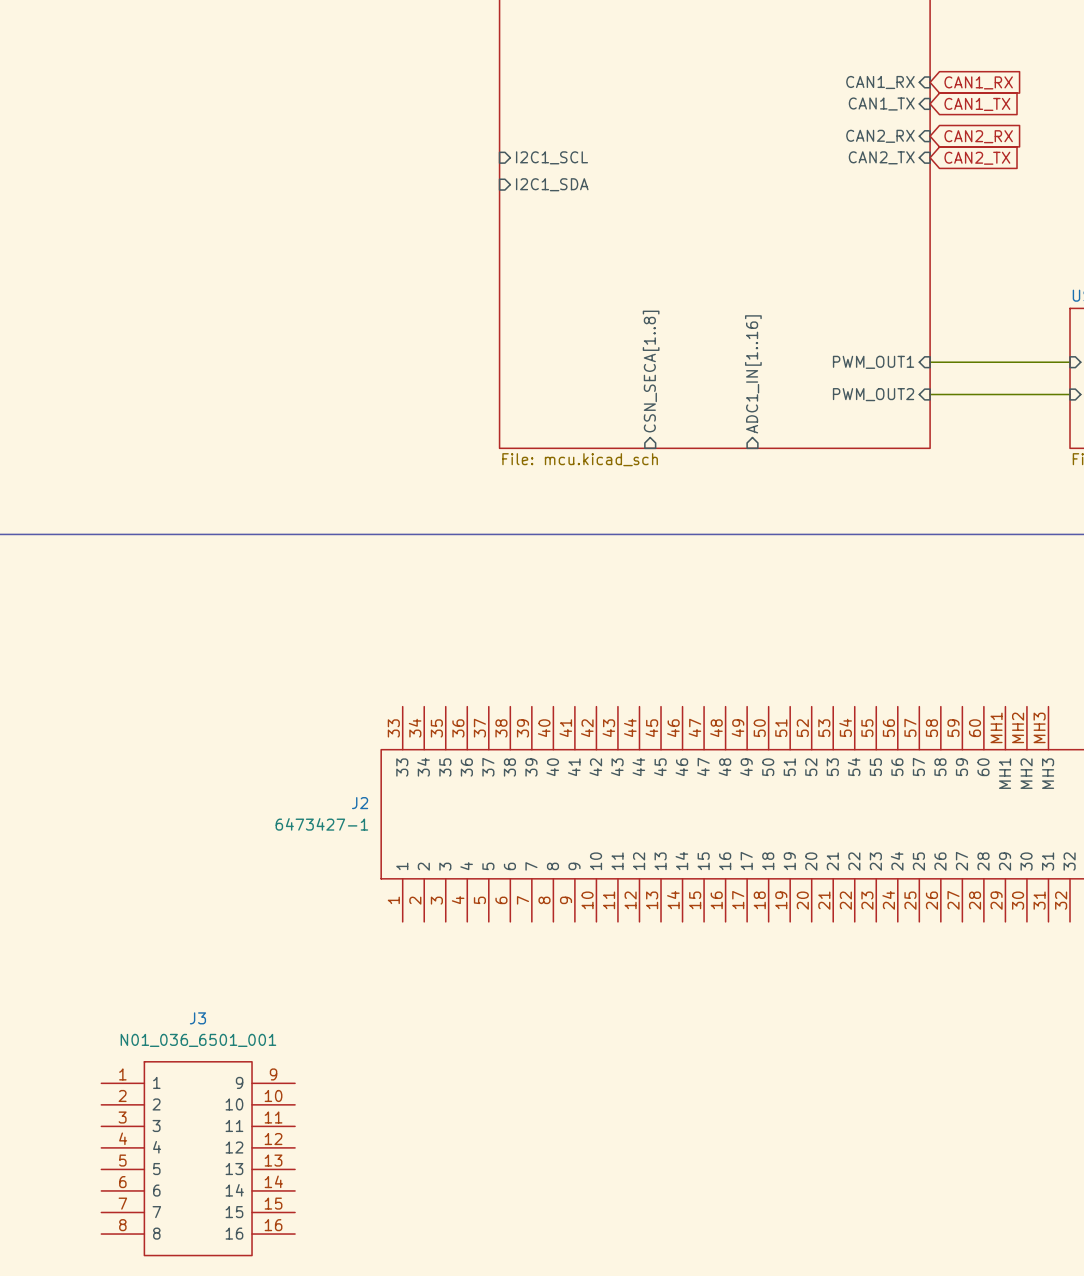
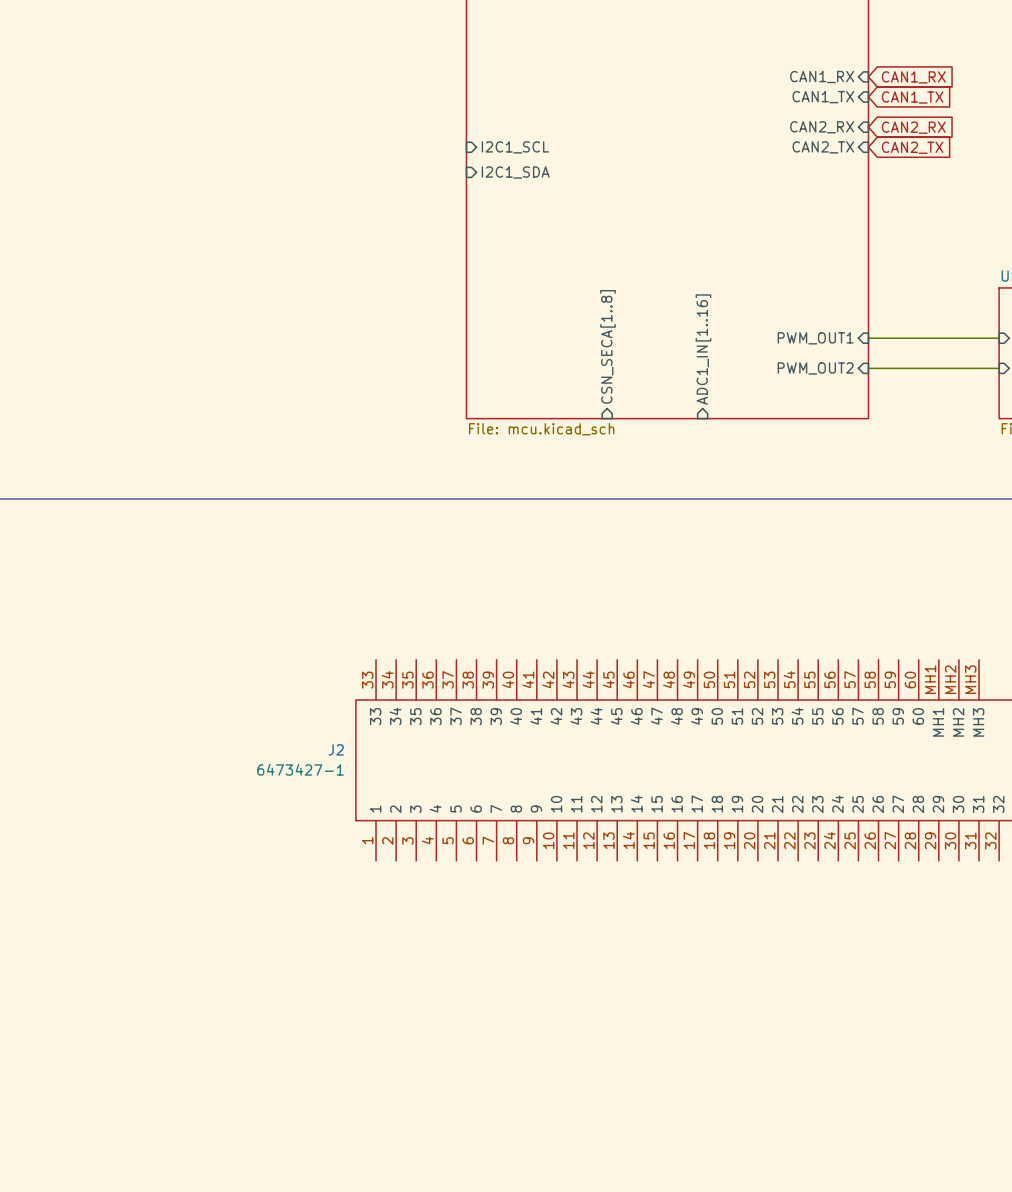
J3: N01_036_6501_001 (198, 1158) -> none

